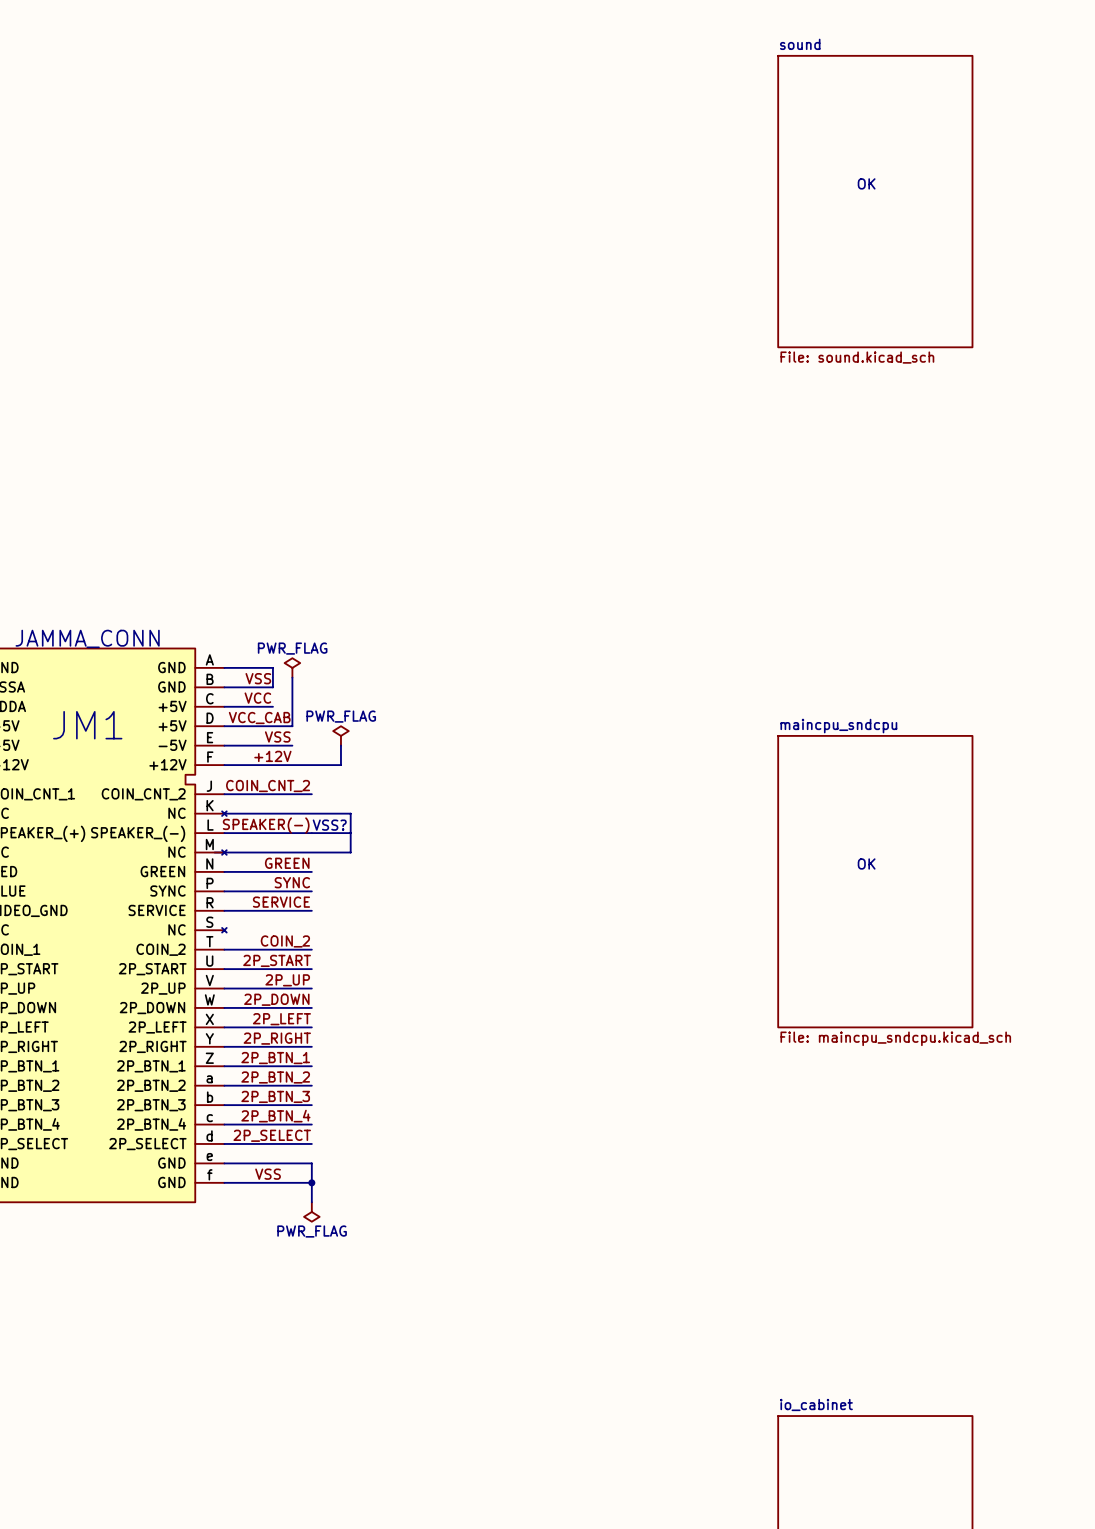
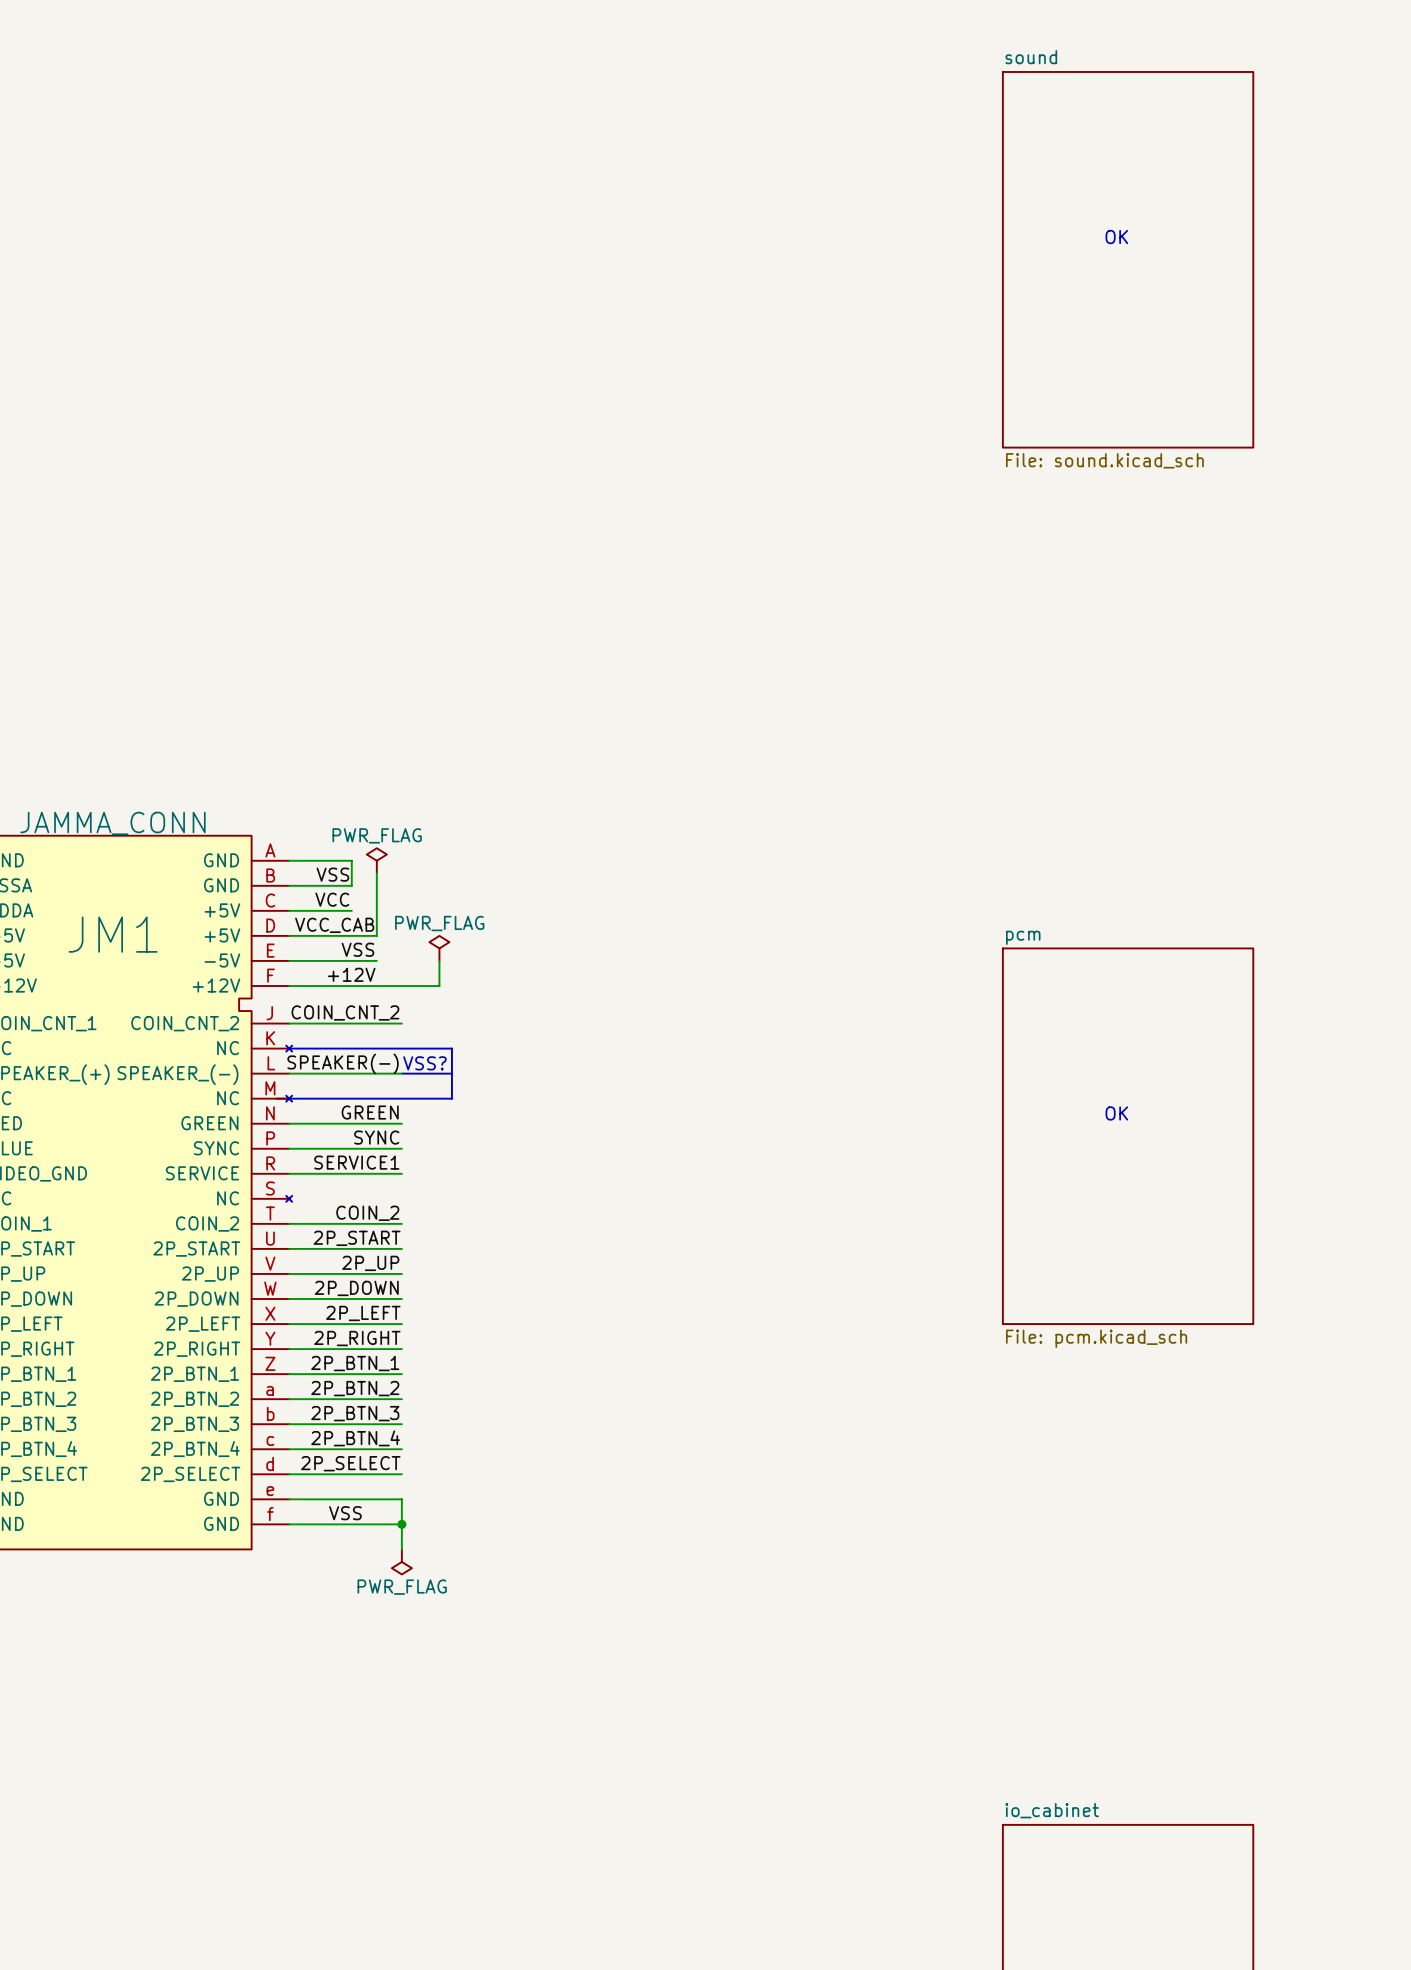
sheet maincpu_sndcpu name: maincpu_sndcpu (838, 726) -> pcm (1023, 937)
label: SERVICE (281, 902) -> SERVICE1 (356, 1162)
sheet maincpu_sndcpu value: File: maincpu_sndcpu.kicad_sch (895, 1038) -> File: pcm.kicad_sch (1096, 1338)

